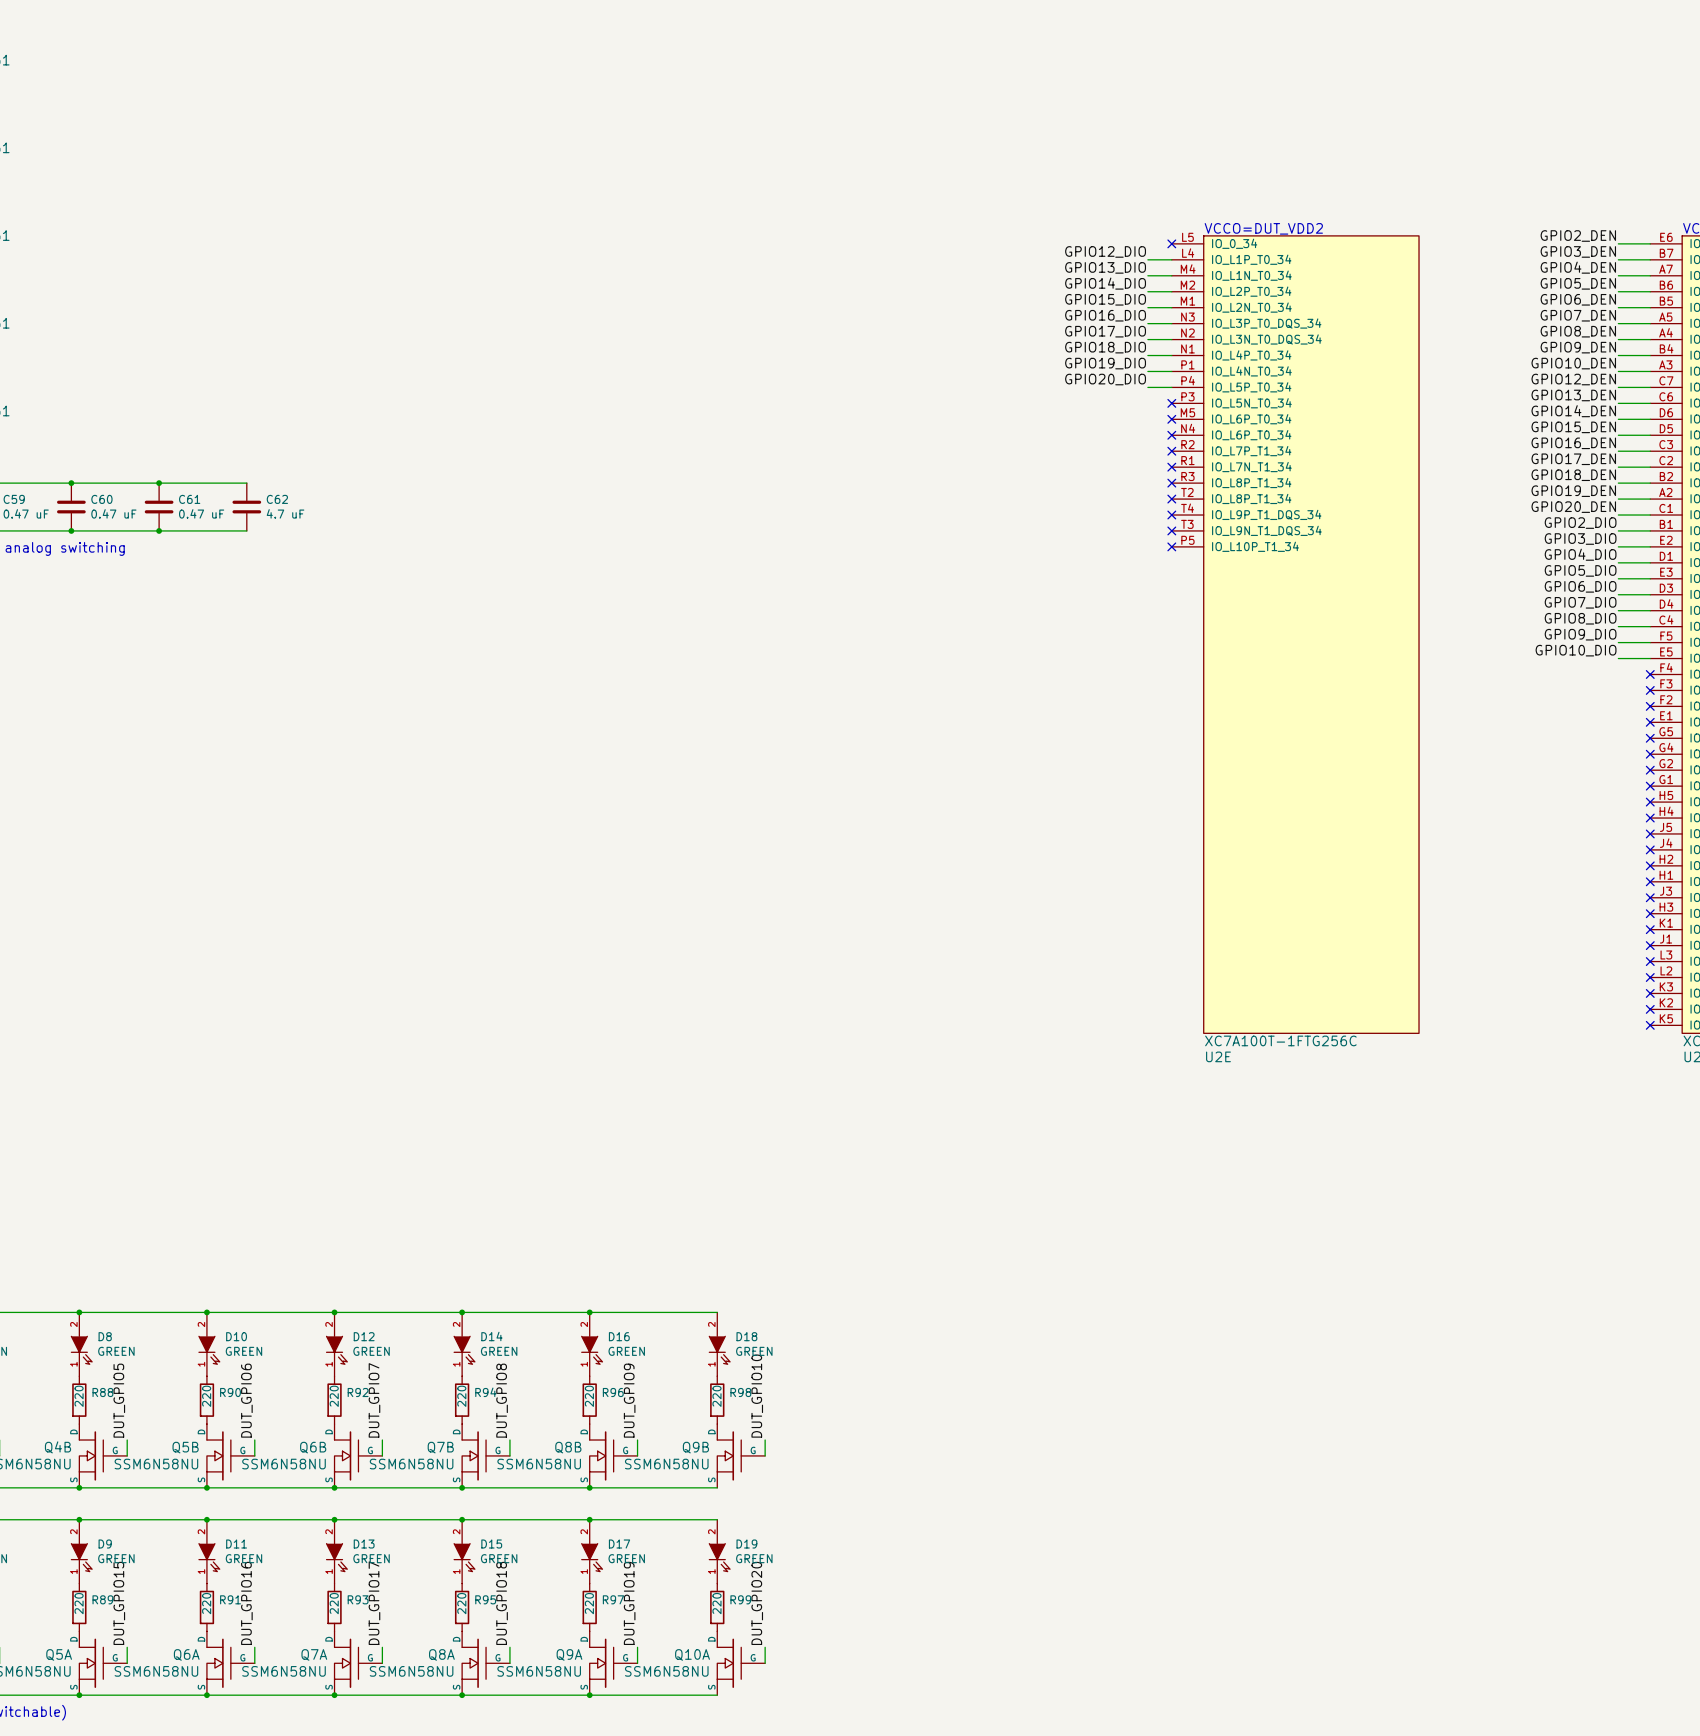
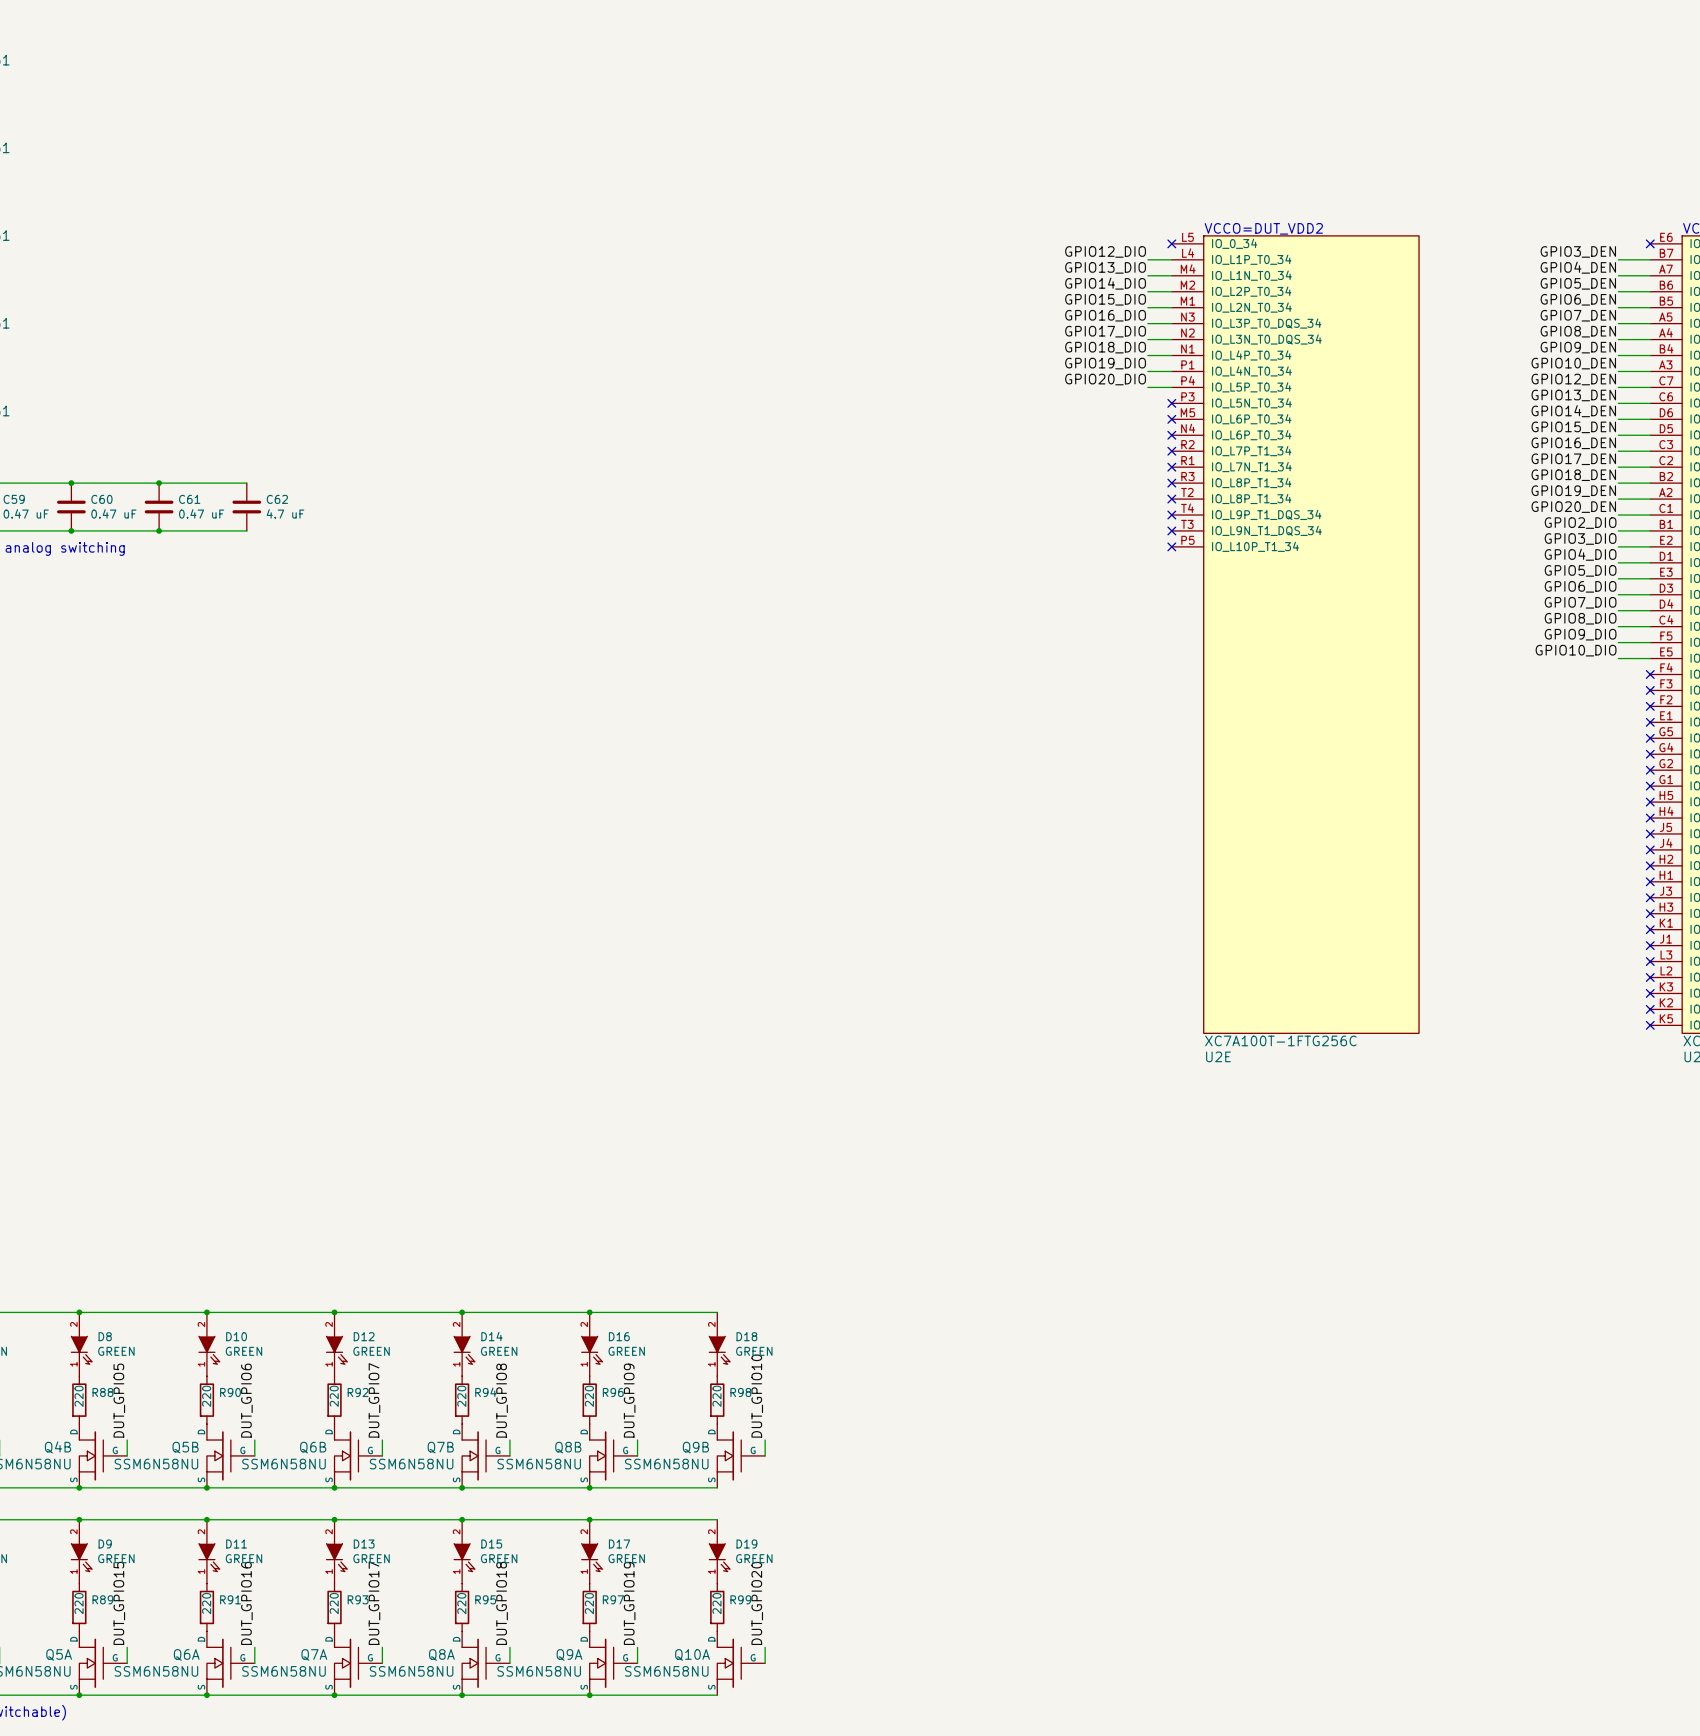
label: GPIO2_DEN (1578, 235) -> none
wire: (1618, 243) (1650, 243) -> none
no-connect mark: none -> (1650, 243)

